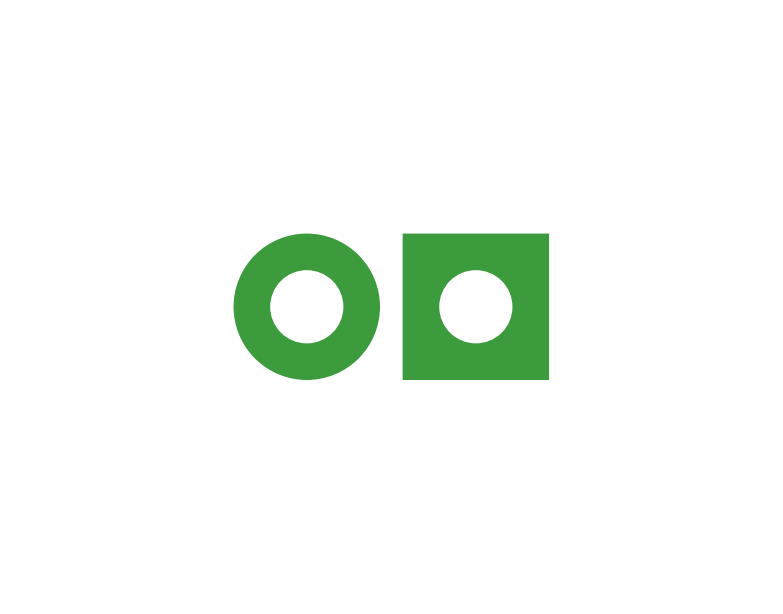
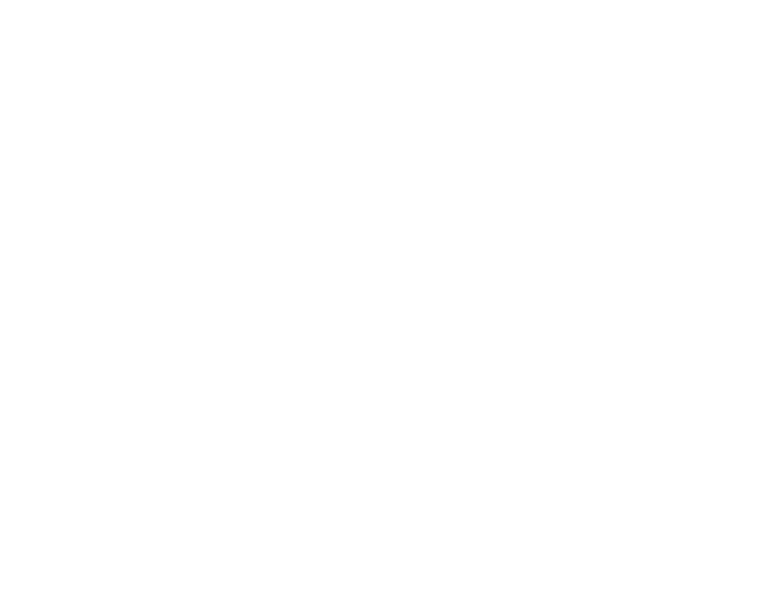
part: (391, 306) -> none

